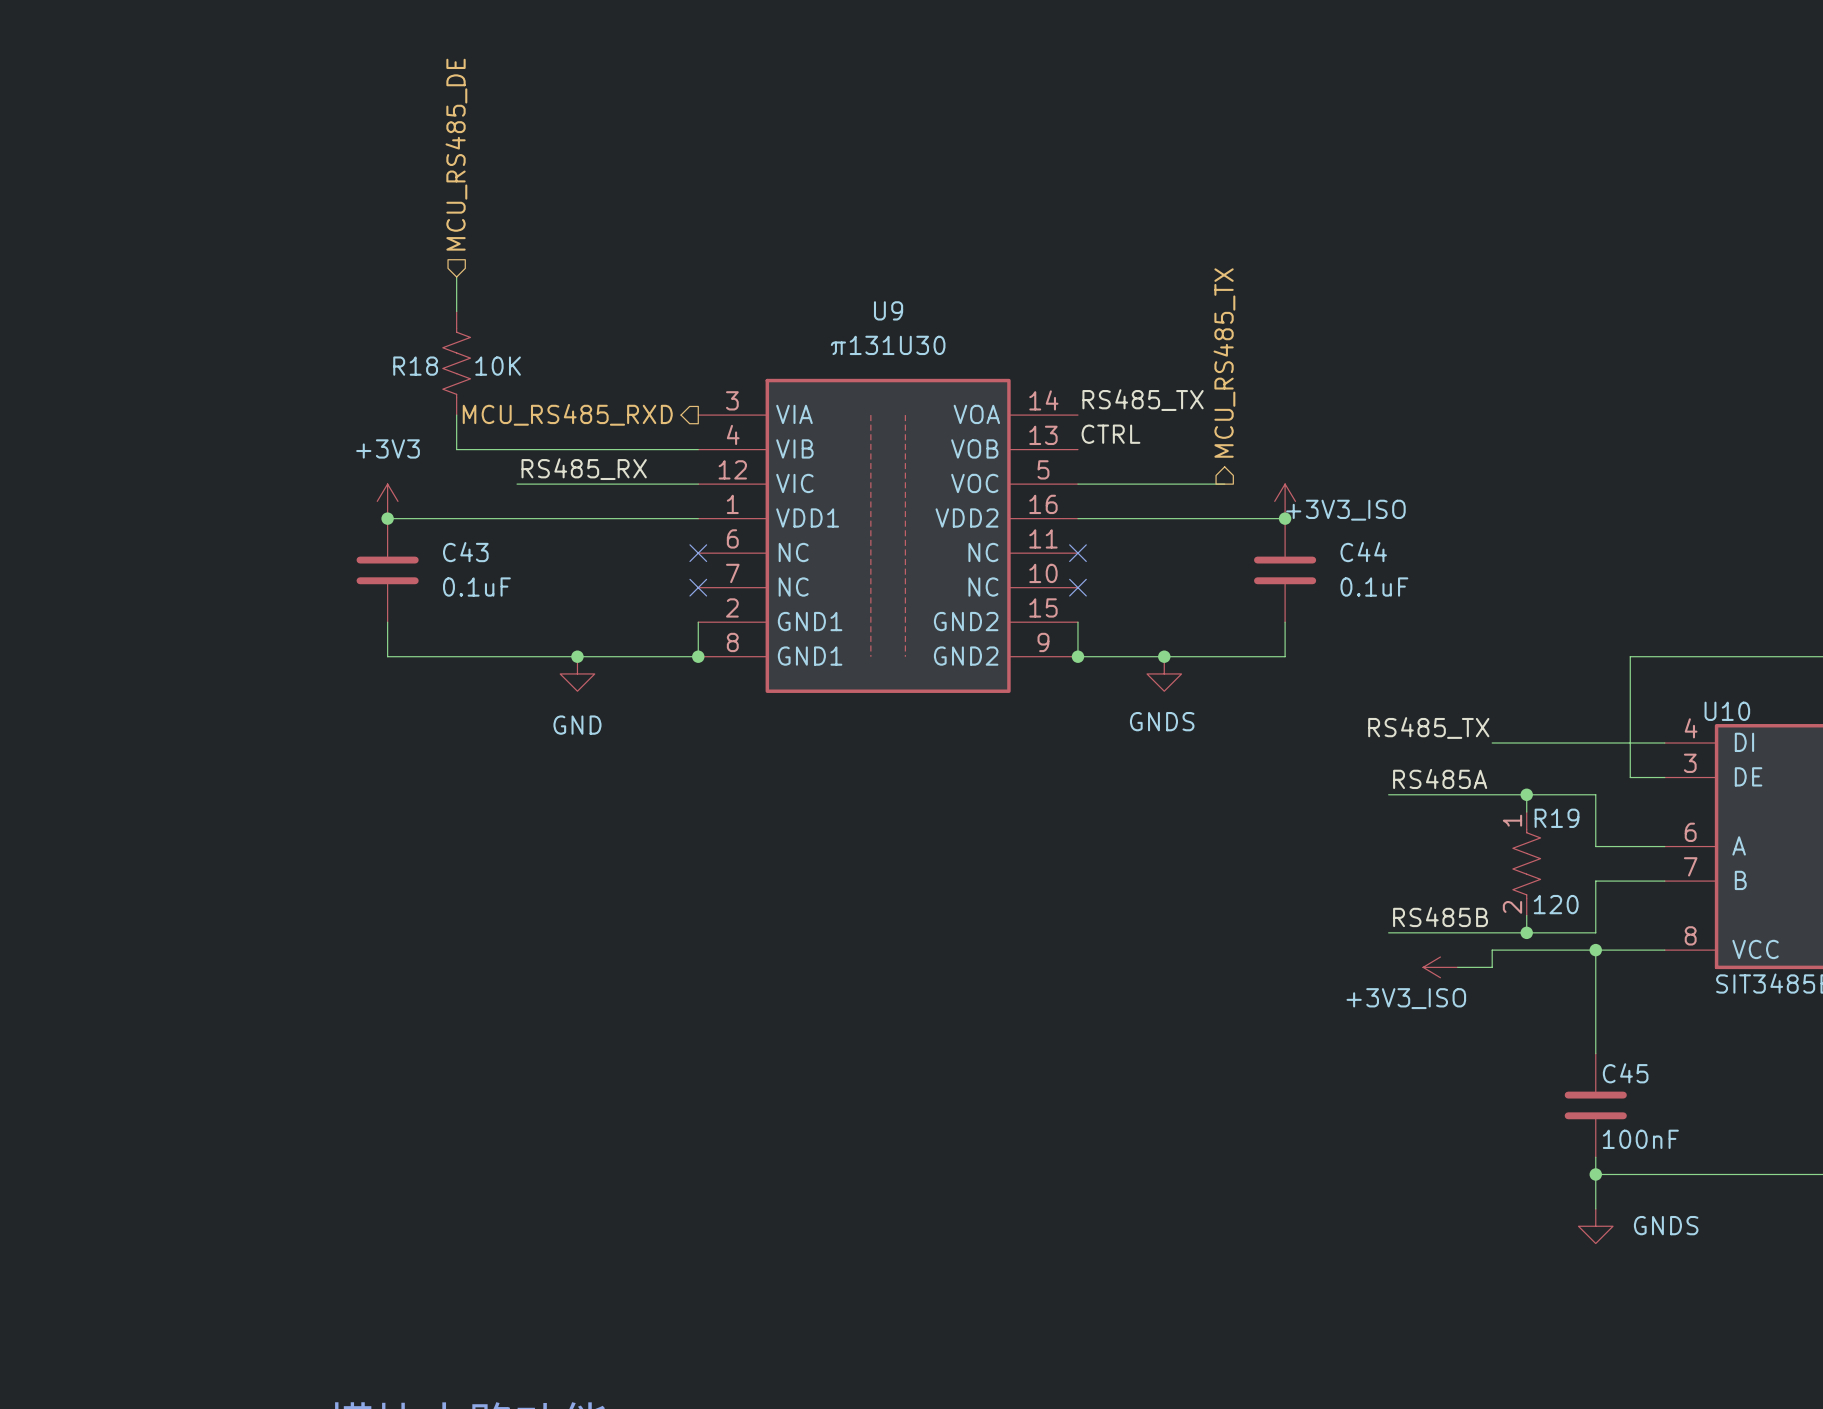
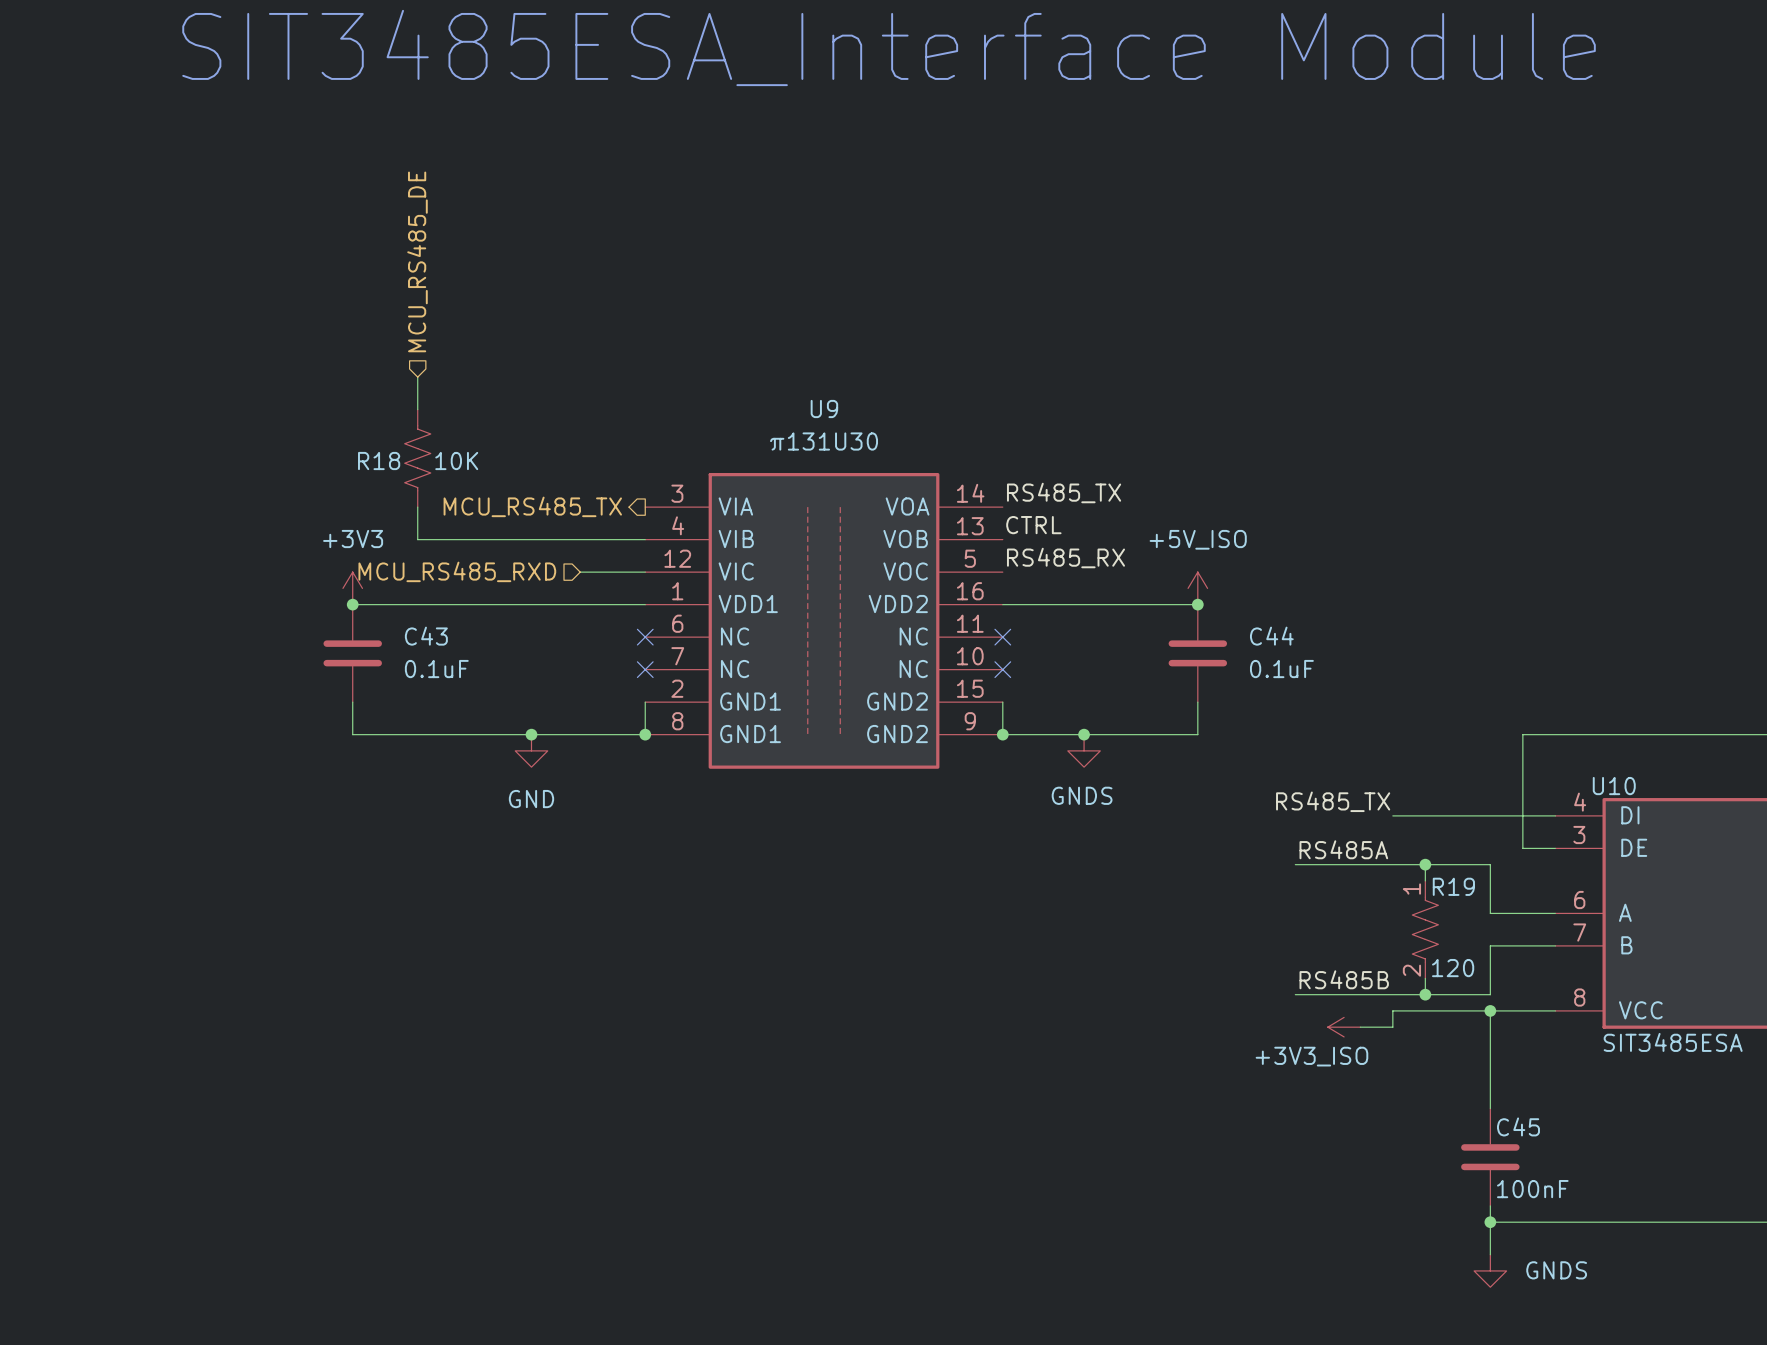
hierarchical label: MCU_RS485_TX (1224, 363) -> none
hierarchical label: MCU_RS485_RXD (567, 414) -> MCU_RS485_TX (532, 506)
label: RS485_RX (584, 469) -> none
label: none -> RS485_RX (1065, 558)
hierarchical label: none -> MCU_RS485_RXD (457, 571)
wire: (517, 484) (629, 484) -> none
wire: (1077, 484) (1224, 484) -> none
power symbol: +3V3_ISO (1285, 501) -> +5V_ISO (1197, 588)

